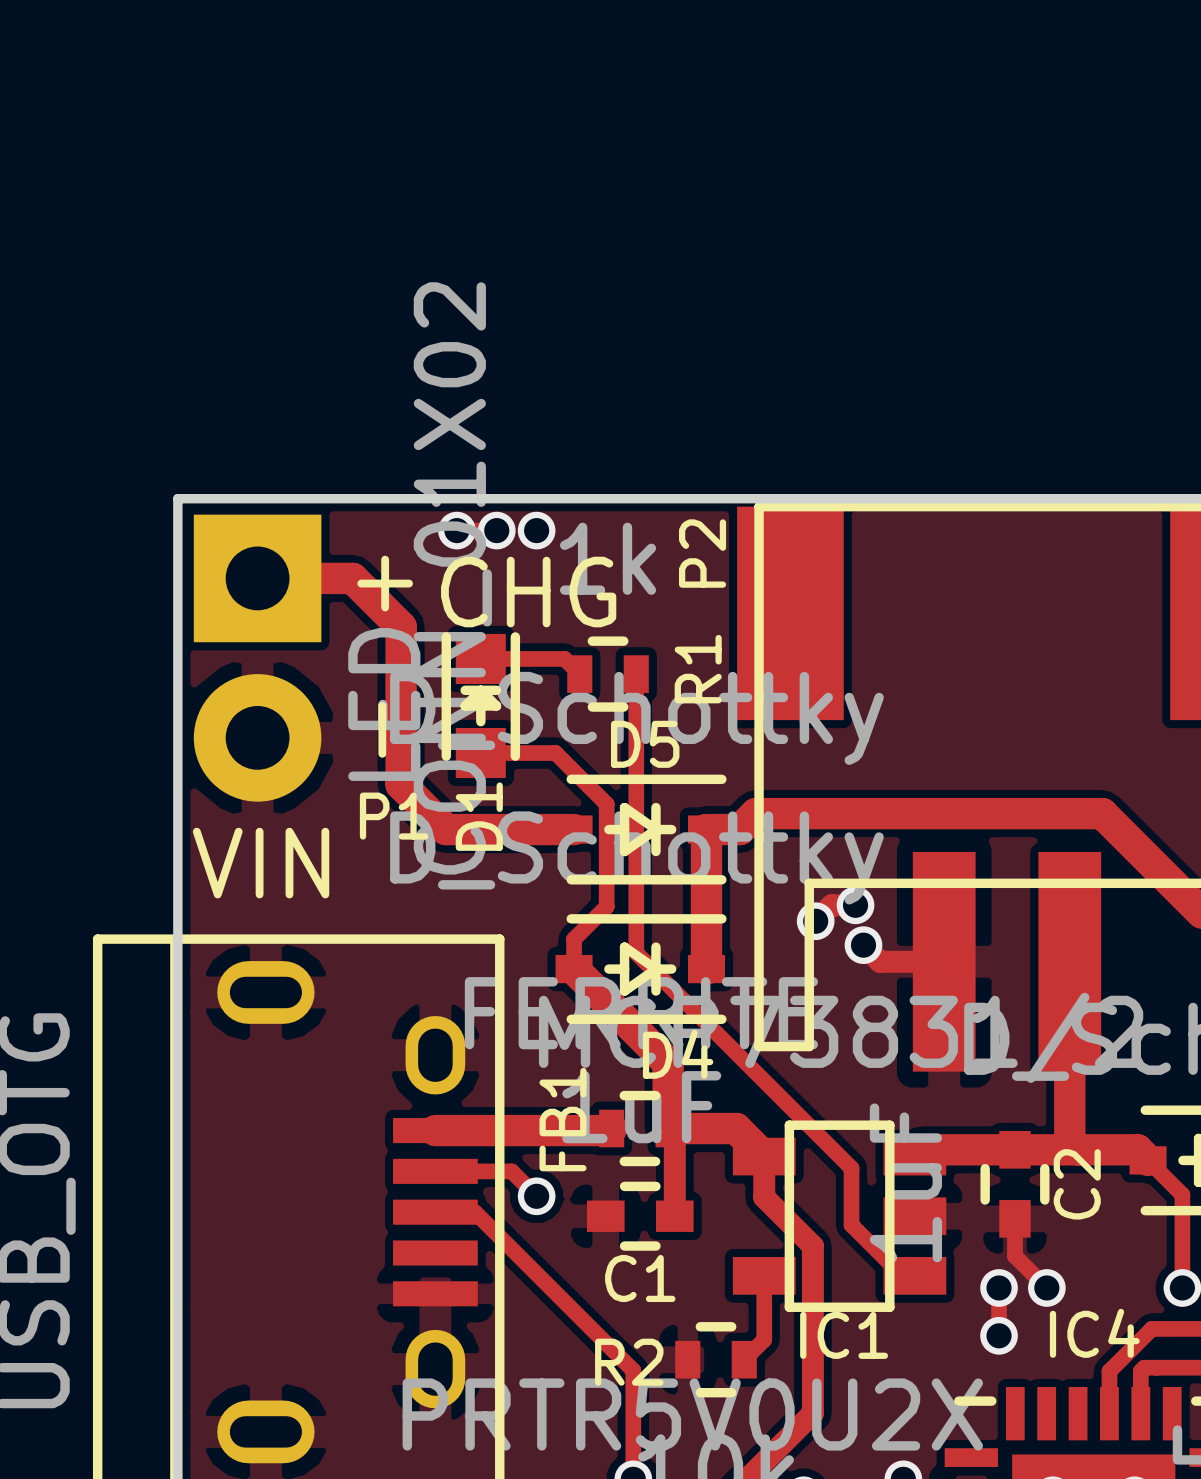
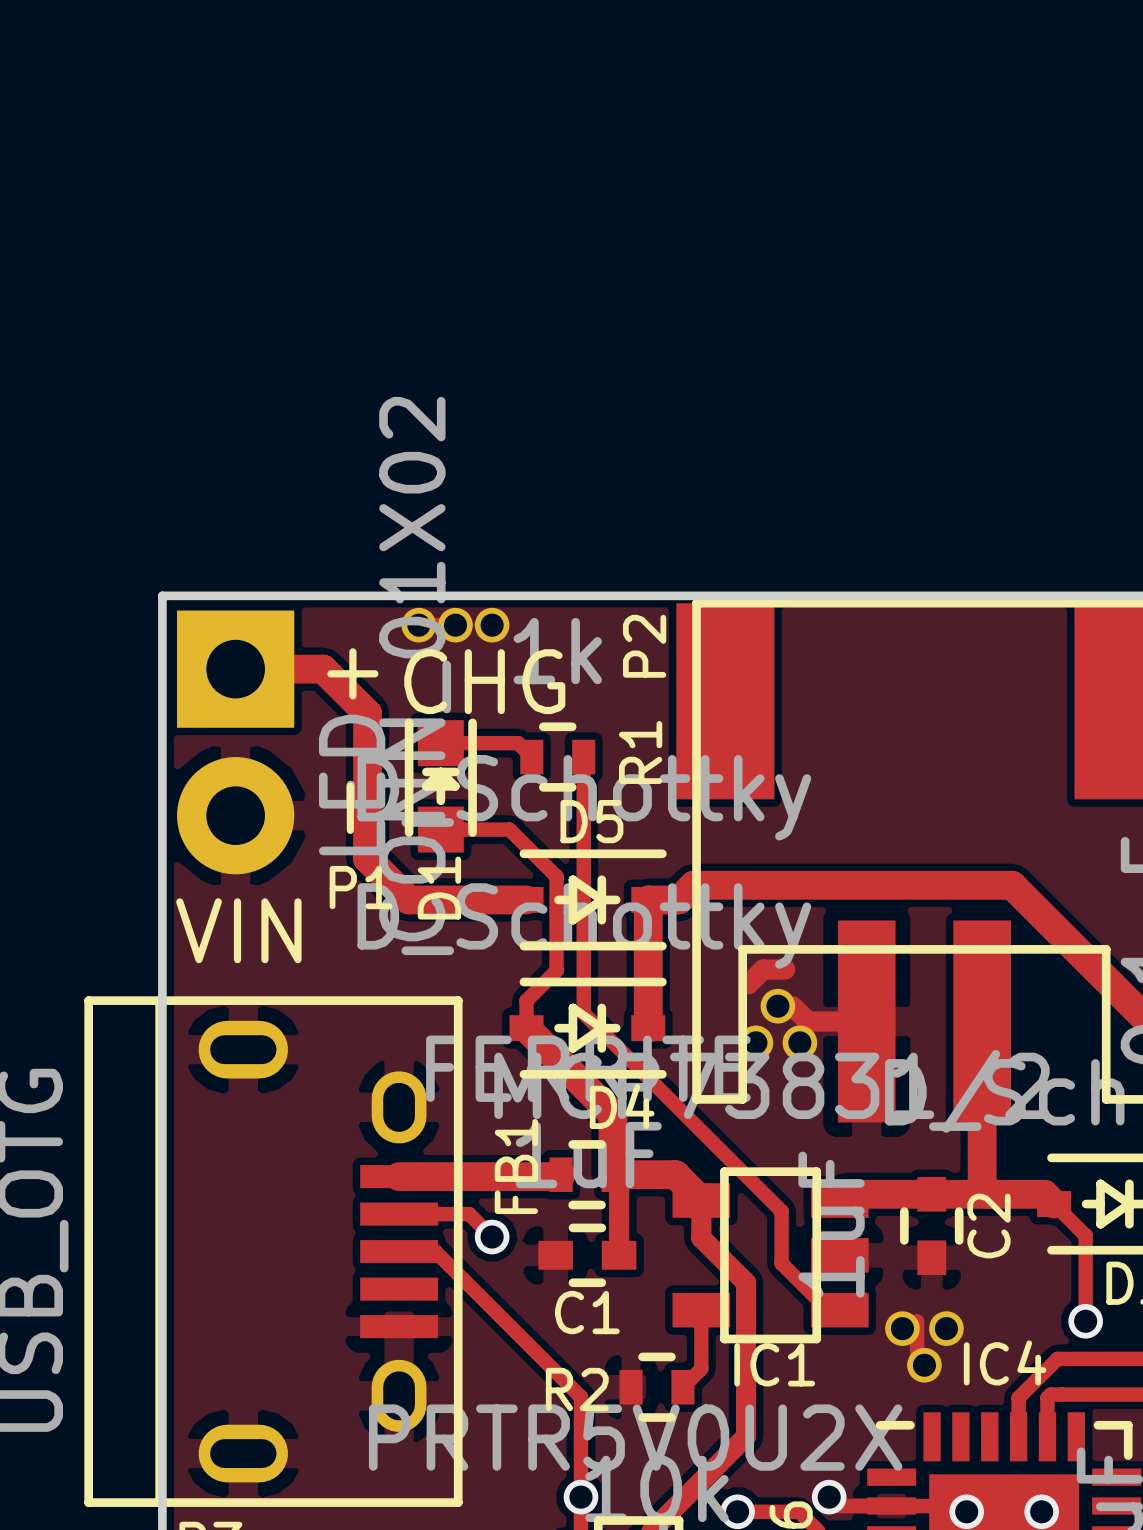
via: (456, 530) -> none
part: none -> (418, 625)
via: (496, 530) -> none
part: none -> (455, 625)
via: (536, 530) -> none
part: none -> (492, 625)
via: (855, 905) -> none
via: (815, 921) -> none
part: none -> (777, 1006)
via: (863, 945) -> none
part: none -> (755, 1042)
part: none -> (799, 1042)
track: (1014, 1218) (1014, 1256) (1046, 1287) -> none
via: (999, 1287) -> none
via: (1046, 1287) -> none
part: none -> (902, 1328)
part: none -> (946, 1328)
via: (999, 1335) -> none
part: none -> (924, 1365)

